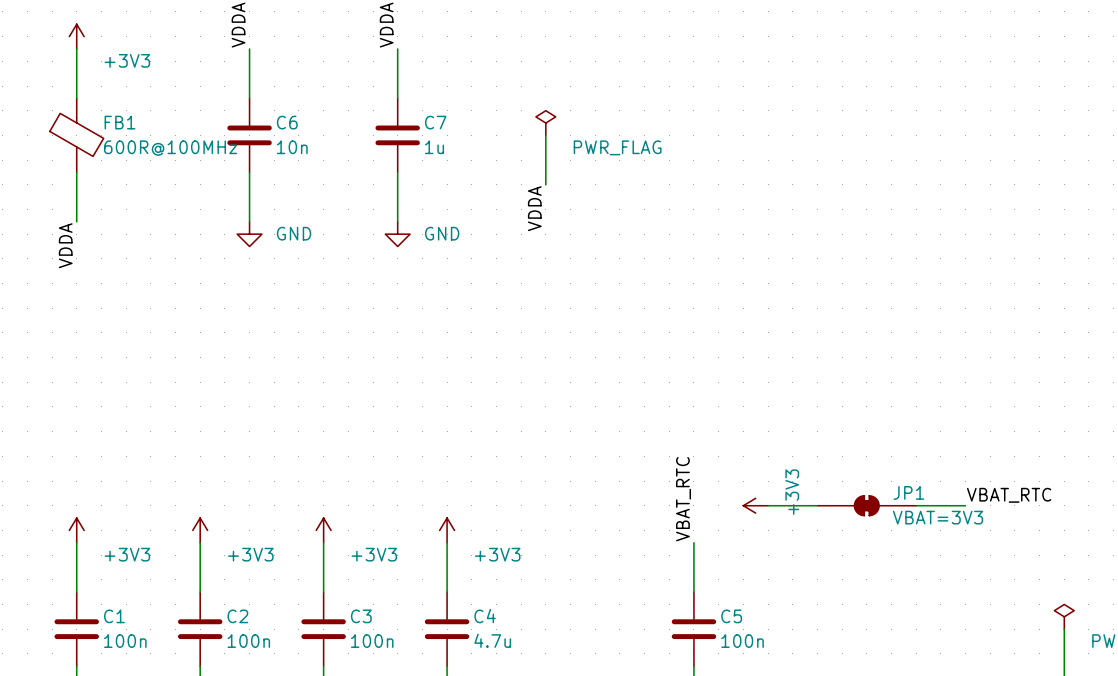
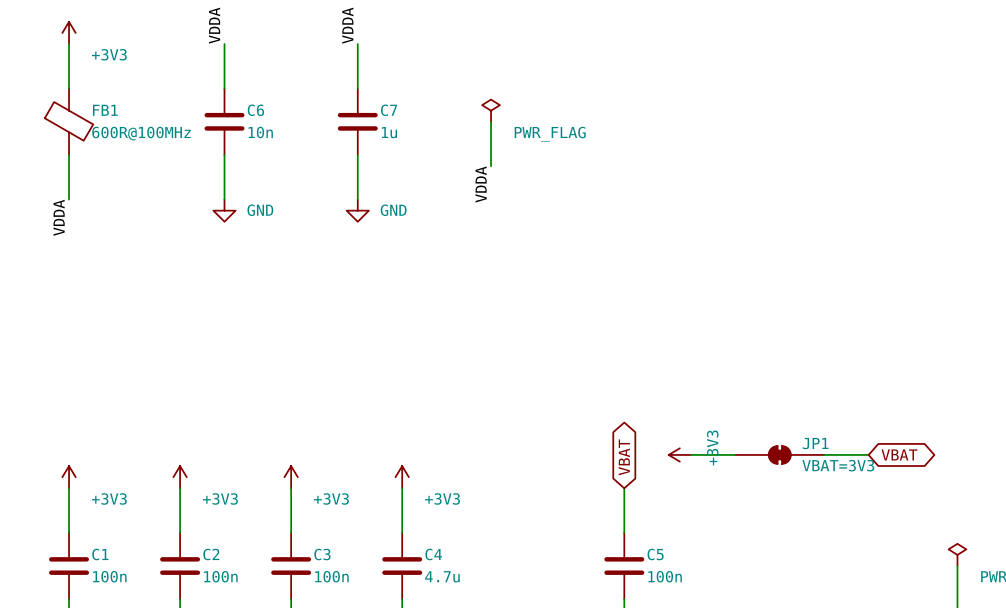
label: VBAT_RTC (1009, 495) -> none
label: VBAT_RTC (683, 499) -> none
global label: none -> VBAT (899, 454)
global label: none -> VBAT (624, 457)

